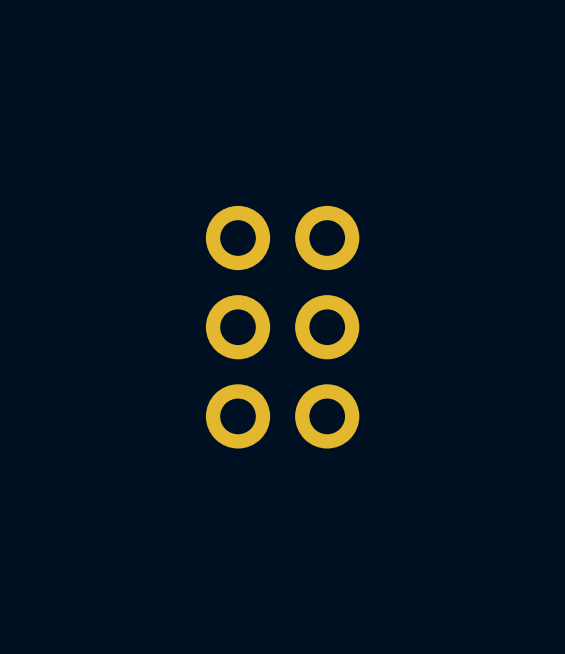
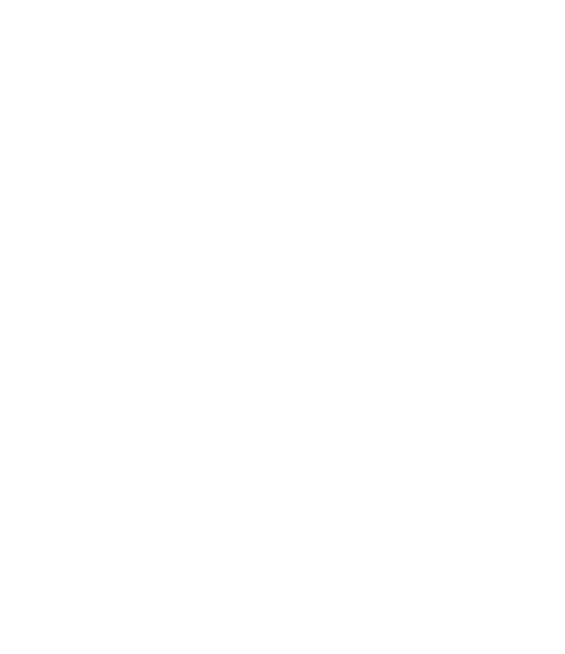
part: (282, 327) -> none

